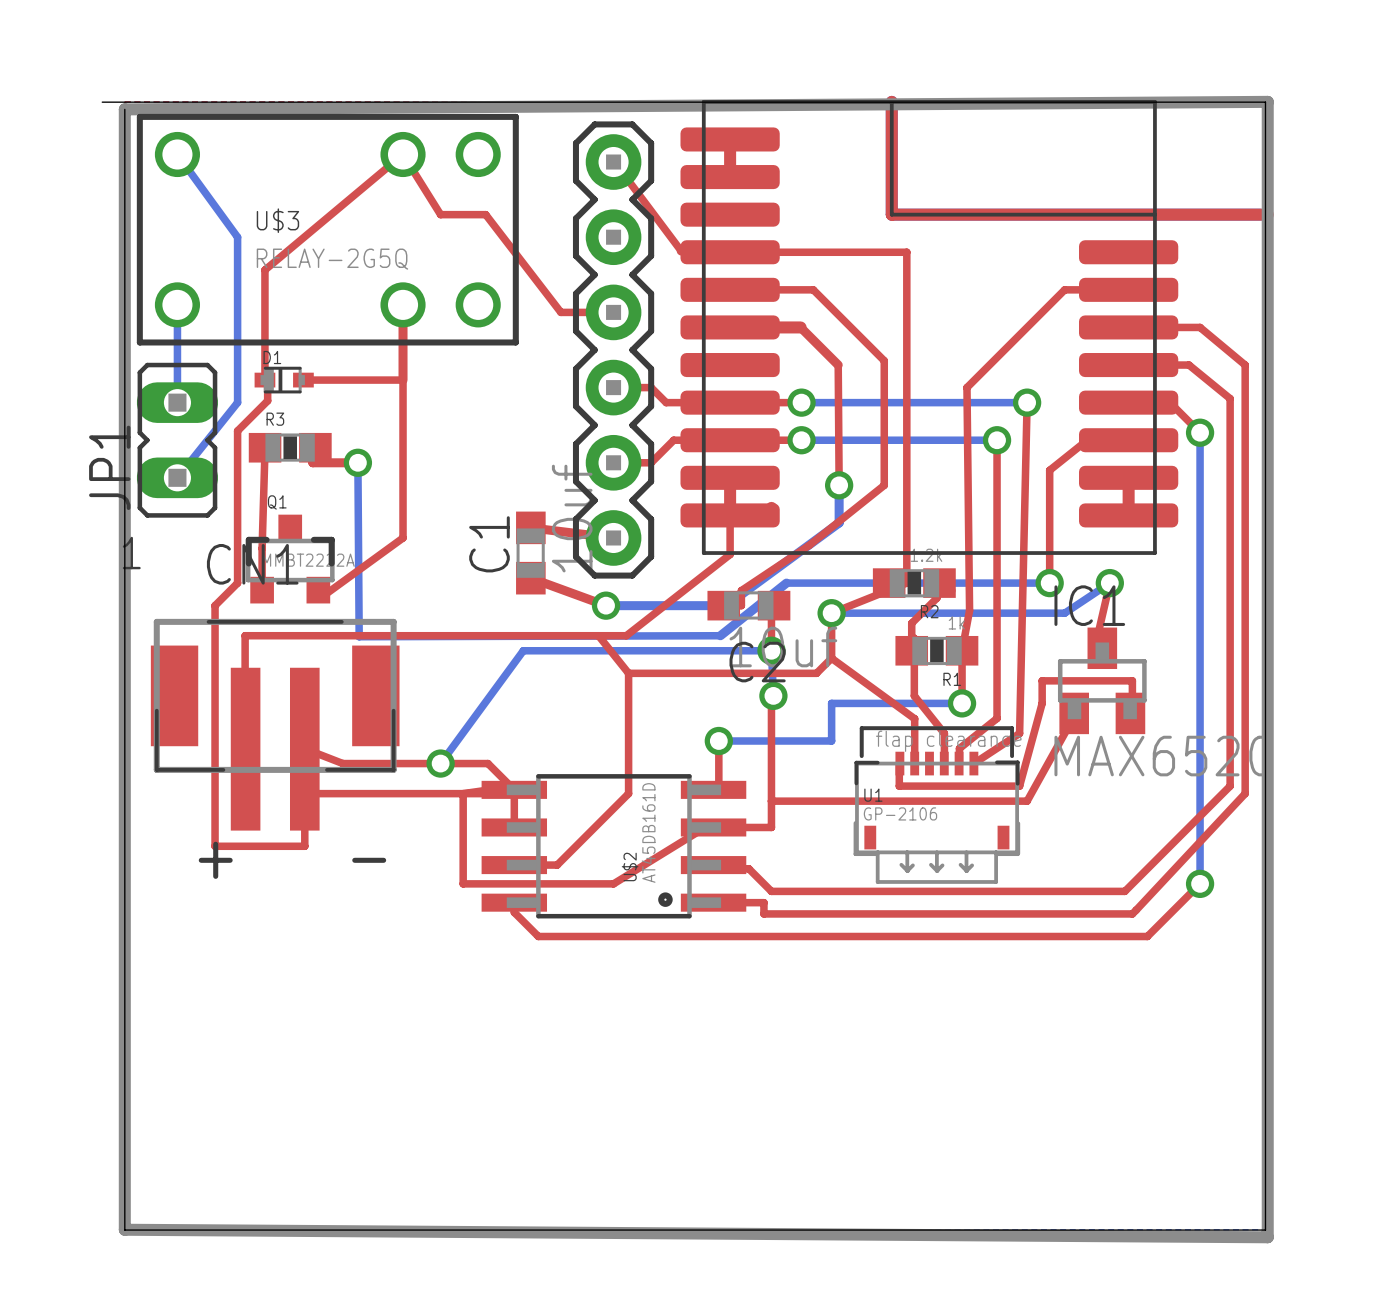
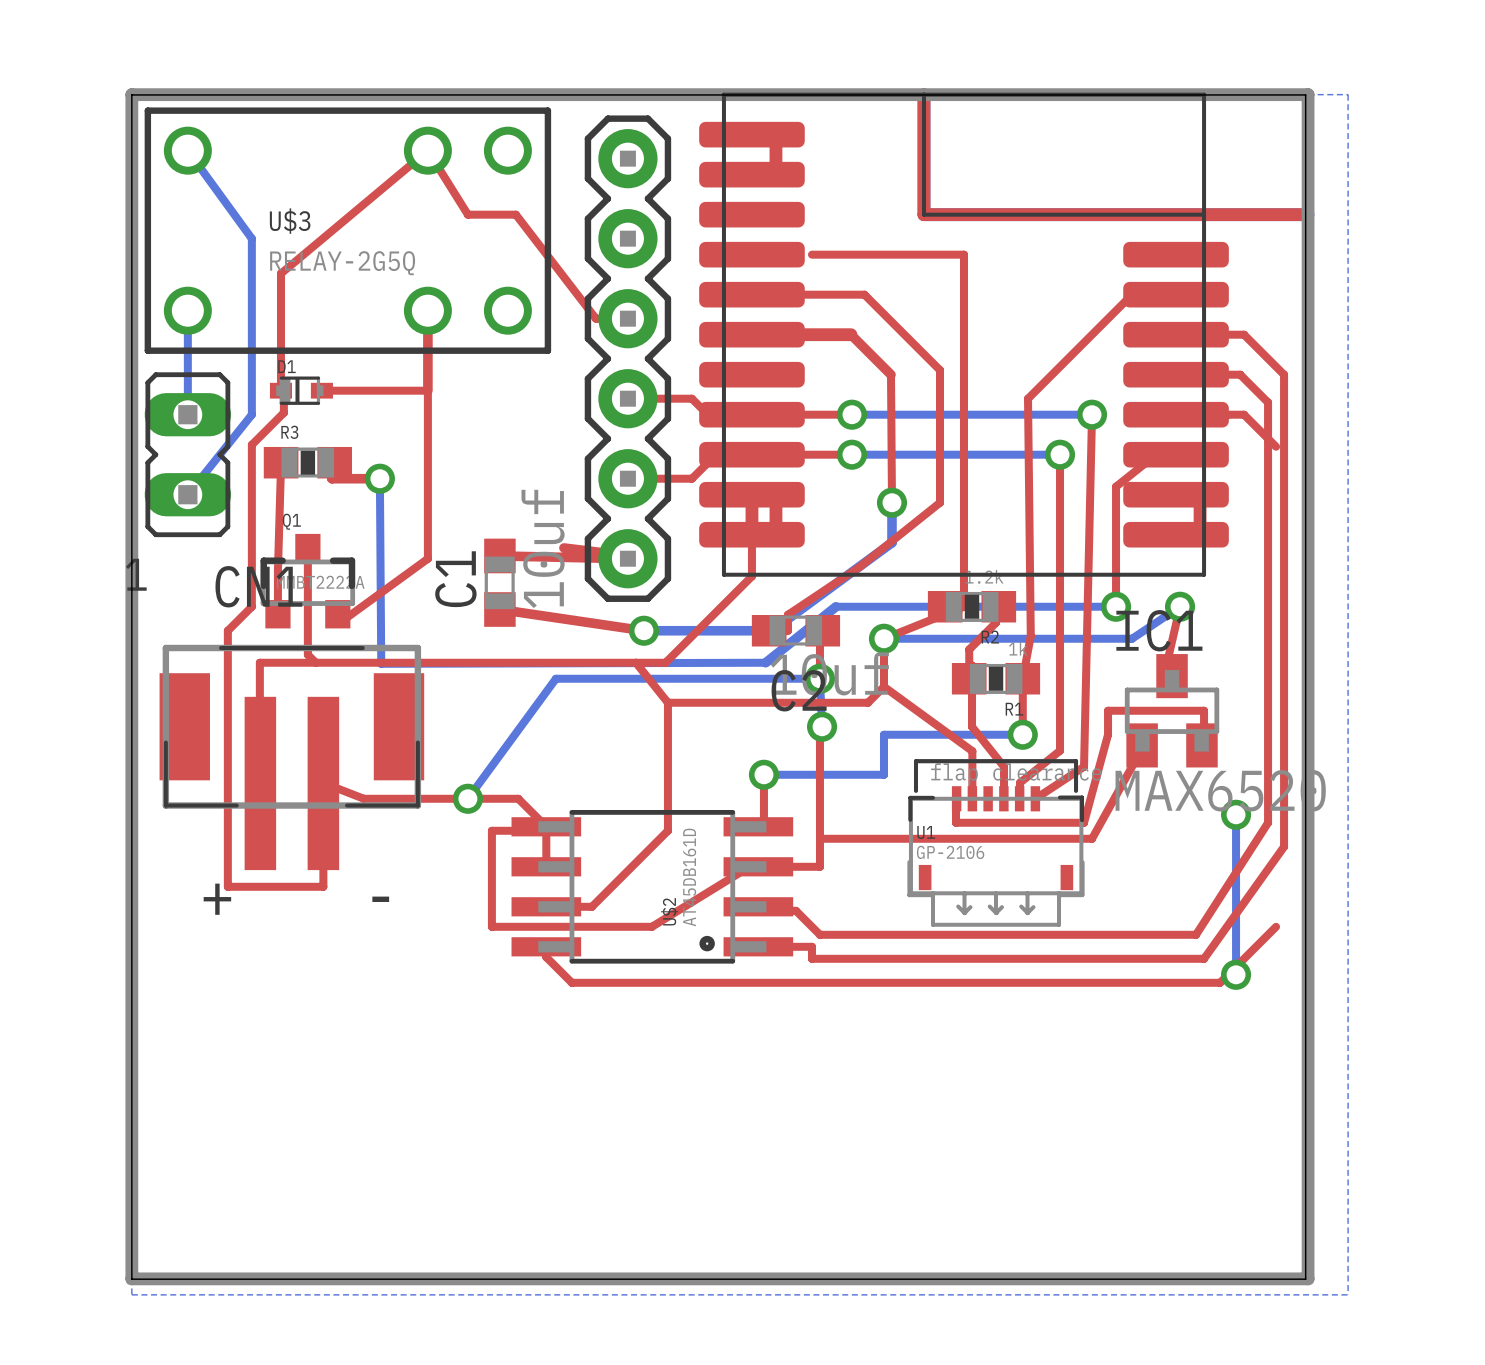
top track: (891, 101) (891, 214) -> (923, 94) (923, 214) (948, 214)
board edge: (102, 102) (124, 102) -> (131, 102) (131, 94)
board edge: (1227, 102) (1265, 102) (1265, 1230) (124, 1230) (124, 1215) -> (1305, 94) (1305, 1279) (131, 1279)
line: (124, 109) (1267, 101) (1267, 1237) (124, 1229) (124, 1214) -> (131, 102) (131, 94) (1308, 94) (1308, 1278) (131, 1278)
top track: (613, 162) (681, 251) (730, 252) -> none
top track: (1222, 214) (1267, 214) -> none
part position: (929, 327) -> (964, 334)
top track: (1169, 327) (1200, 327) (1245, 365) (1245, 793) (1132, 913) -> (1244, 334) (1284, 374) (1284, 846) (1204, 958)
part position: (613, 350) -> (627, 358)
top track: (1166, 365) (1188, 365) (1230, 398) (1230, 786) (1124, 891) -> (1240, 374) (1268, 402) (1268, 822) (1196, 934)
bottom track: (1200, 432) (1200, 883) -> none
via: (1200, 432) -> none
JP1 name: JP1 (109, 467) -> none
top track: (771, 507) (771, 515) (730, 515) (730, 554) (626, 635) -> (751, 494) (751, 576) (665, 662)
top track: none -> (307, 548) (307, 654) (315, 662)
top track: none -> (499, 555) (627, 558)
C1 position: (530, 553) -> (499, 582)
top track: (530, 578) (606, 605) -> (499, 609) (643, 630)
bottom track: none -> (1236, 814) (1236, 974)
via: none -> (1236, 814)
top track: (515, 786) (463, 793) (305, 793) -> none
via: (1200, 883) -> none
via: none -> (1236, 974)

